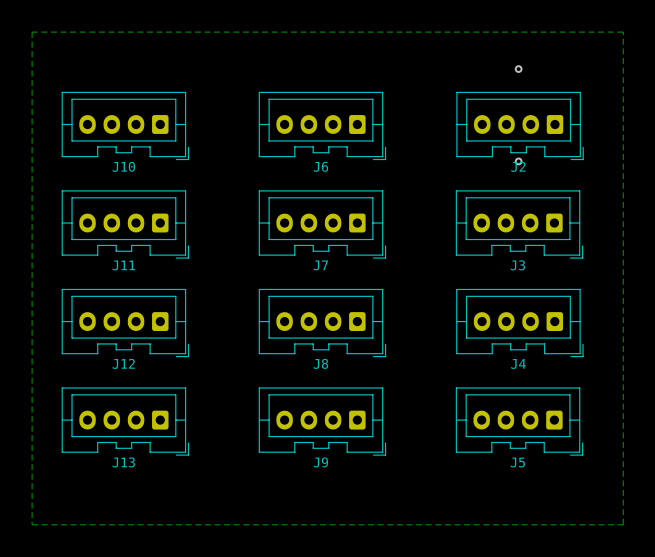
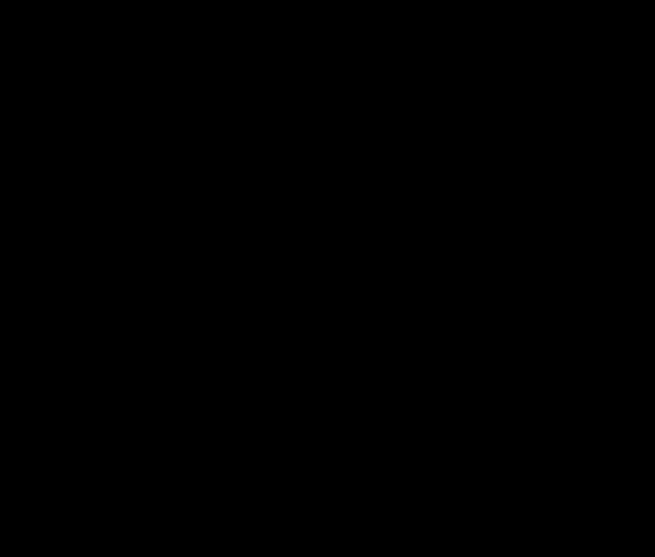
zone outline: (623, 32) (32, 32) (32, 524) (623, 524) (623, 32) -> none
via: (518, 69) -> none
J10: (125, 125) -> none
J6: (322, 125) -> none
J2: (520, 125) -> none
via: (518, 161) -> none
J11: (125, 224) -> none
J7: (322, 224) -> none
J3: (519, 224) -> none
J12: (125, 323) -> none
J8: (322, 323) -> none
J4: (519, 323) -> none
J13: (125, 421) -> none
J9: (322, 421) -> none
J5: (519, 421) -> none

